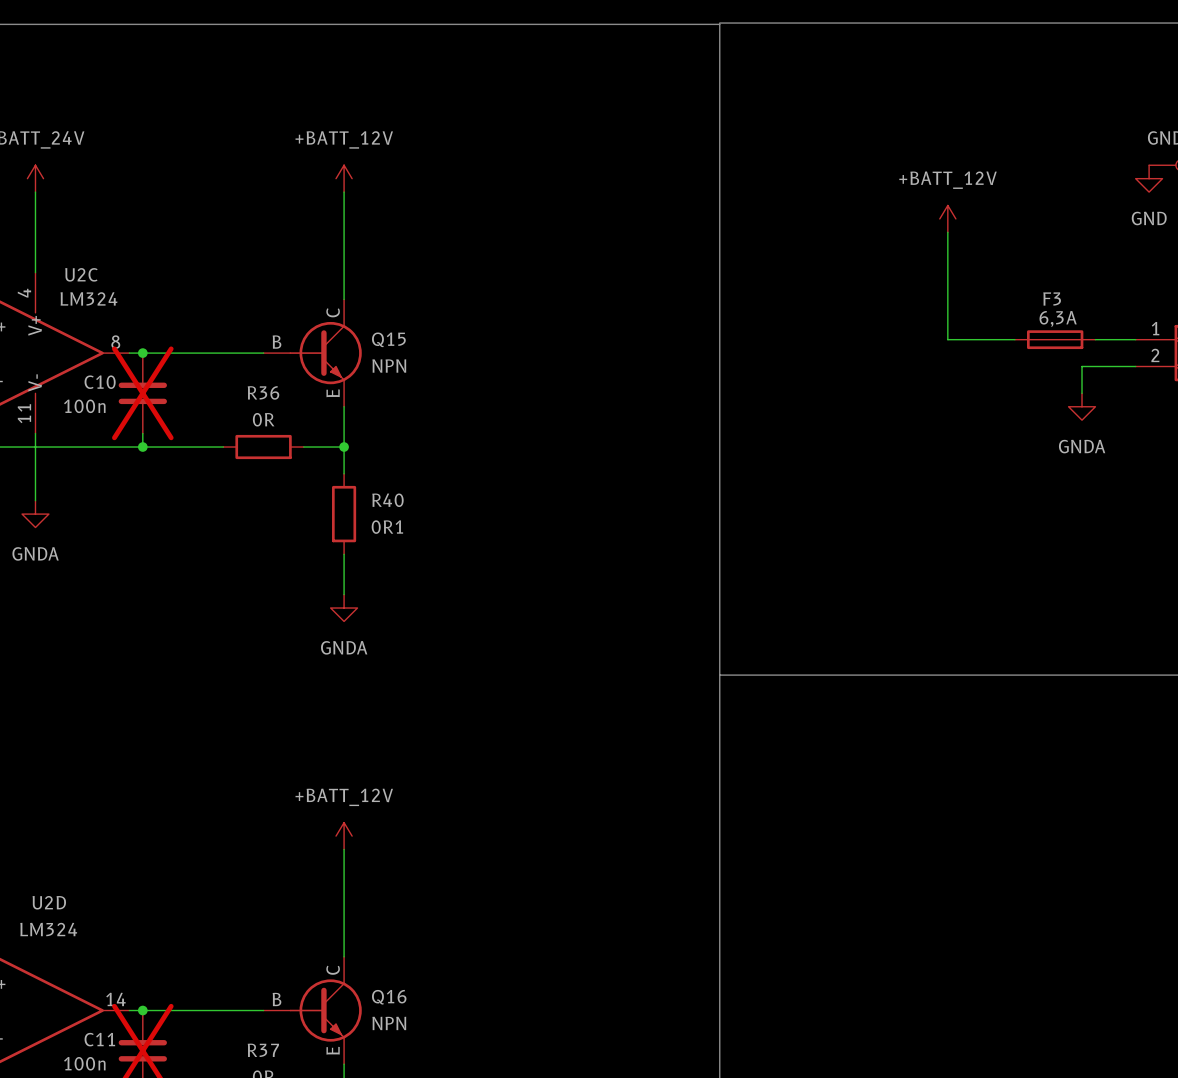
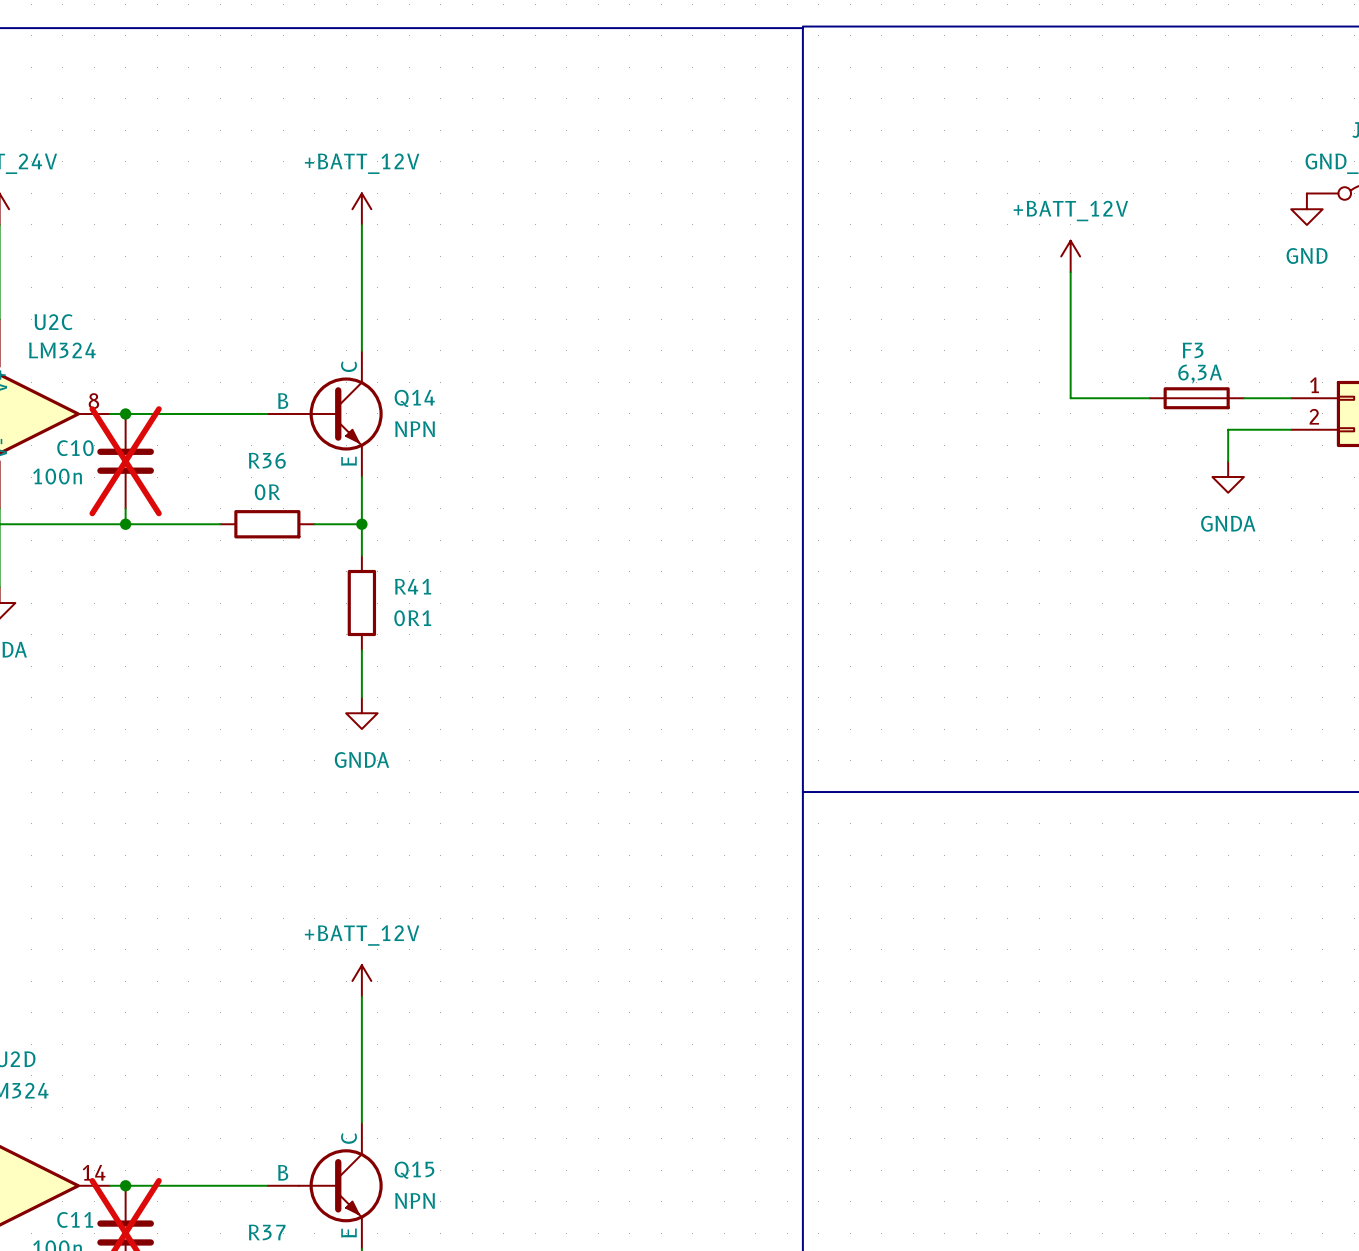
Q15 name: Q15 (388, 339) -> Q14 (414, 398)
R40 name: R40 (387, 500) -> R41 (413, 586)
Q16 name: Q16 (389, 997) -> Q15 (414, 1170)

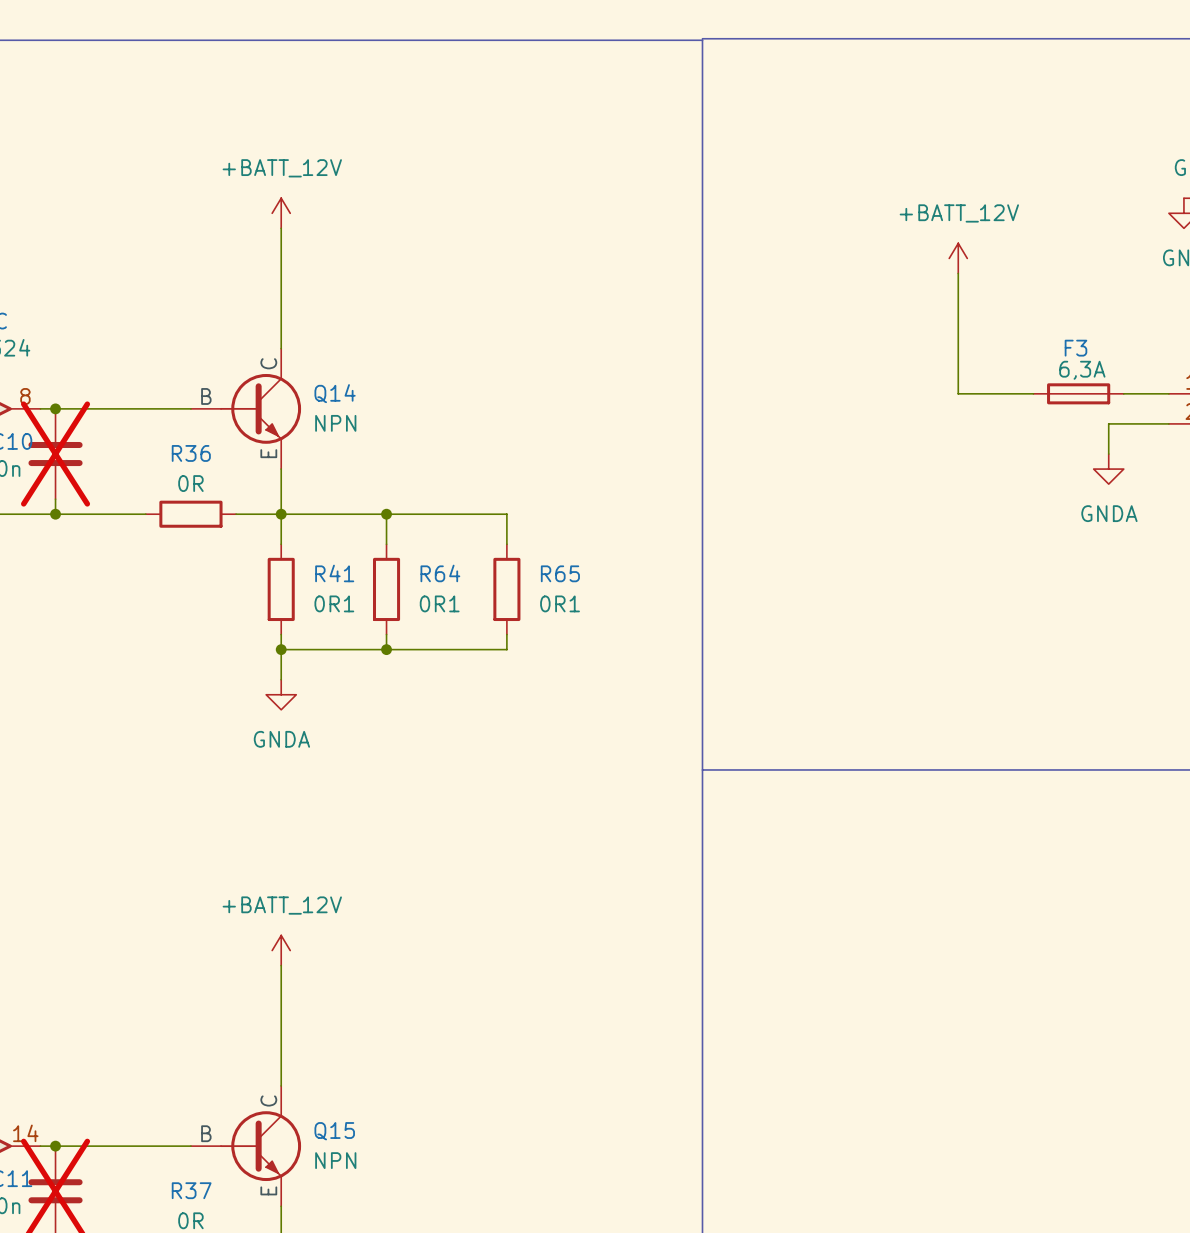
wire: none -> (281, 514) (506, 514) (506, 544)
wire: none -> (386, 514) (386, 544)
junction: none -> (386, 514)
R64: none -> 0R1 (386, 589)
R65: none -> 0R1 (506, 589)
wire: none -> (386, 634) (386, 649)
wire: none -> (506, 634) (506, 649) (281, 649)
junction: none -> (281, 649)
junction: none -> (386, 649)

